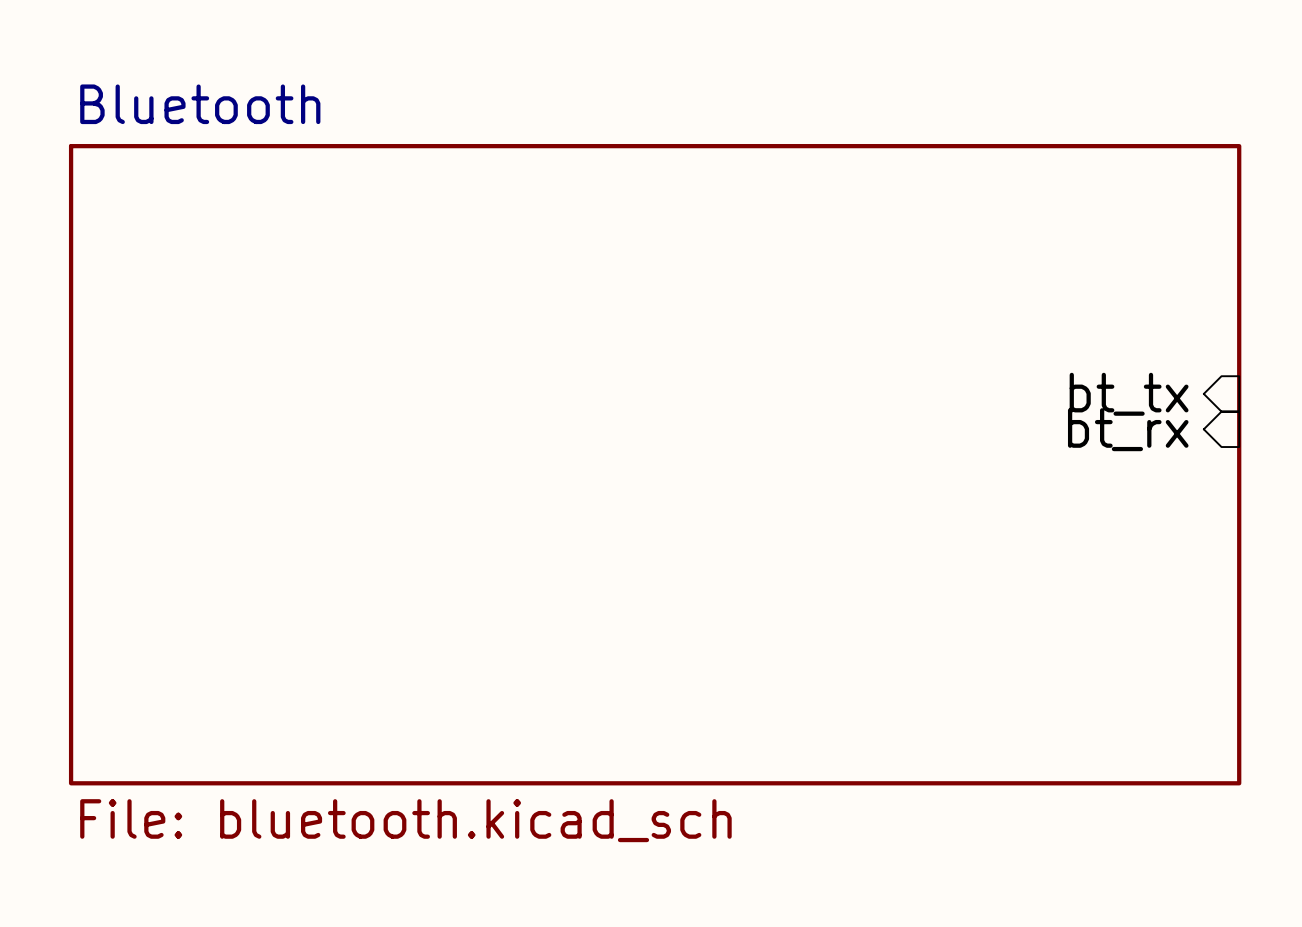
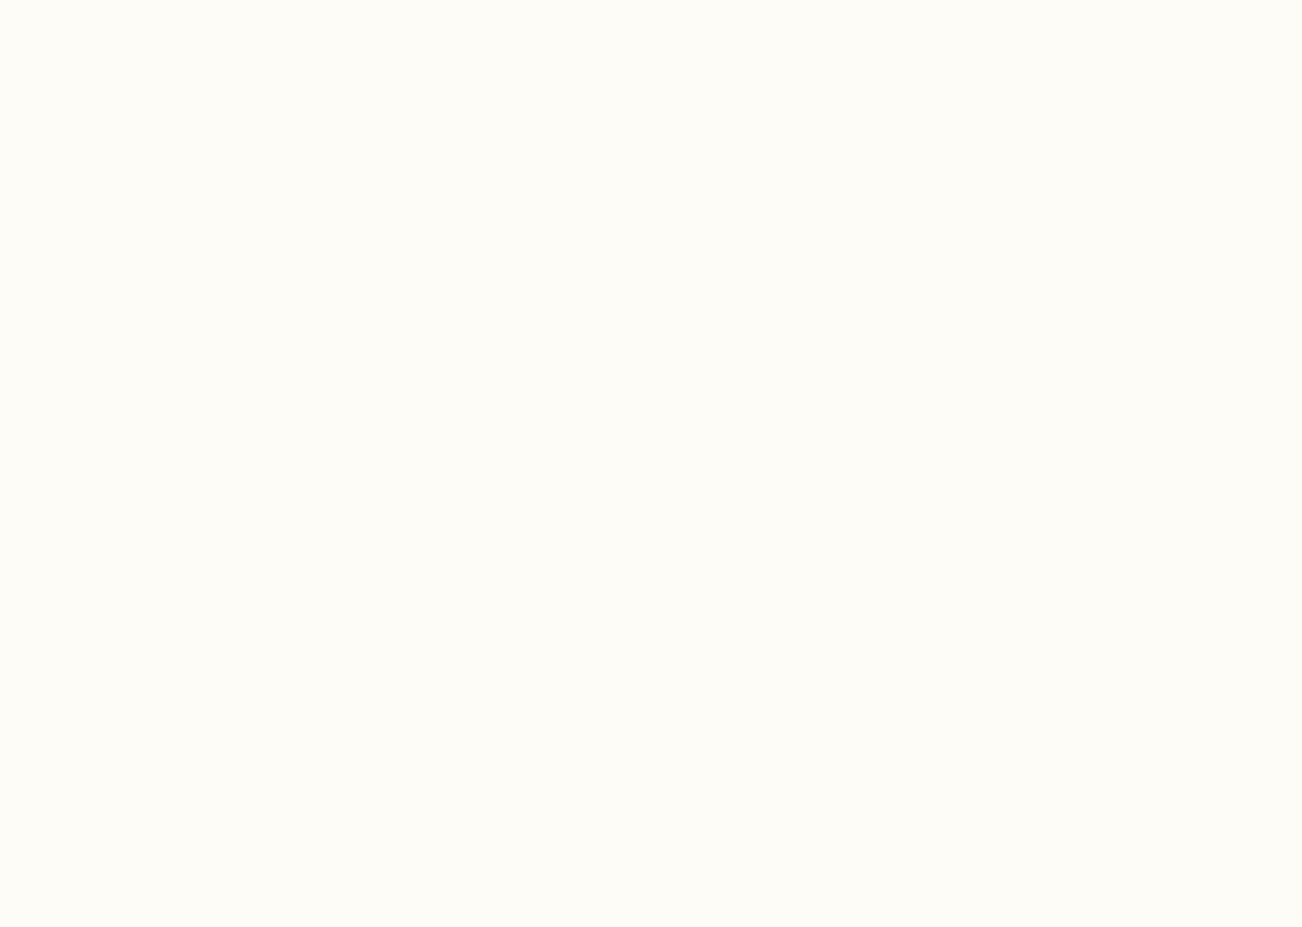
sheet pin: bt_tx (1129, 394) -> none
sheet pin: bt_rx (1128, 429) -> none
sheet Bluetooth: File: bluetooth.kicad_sch (655, 464) -> none

